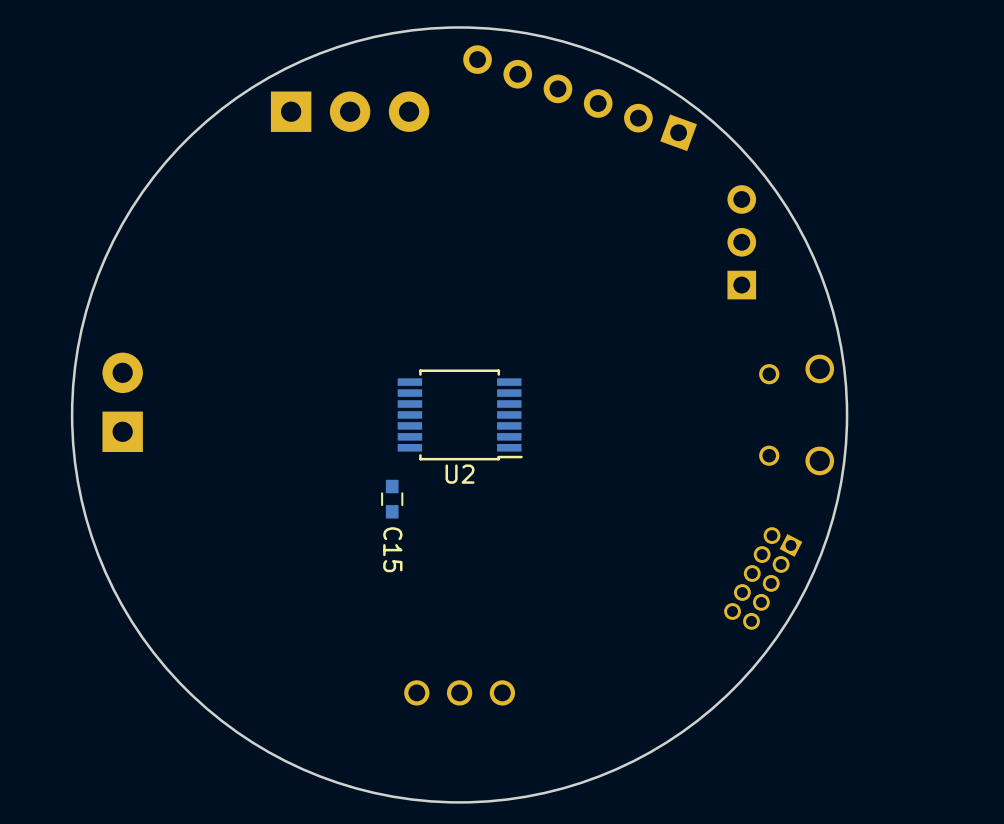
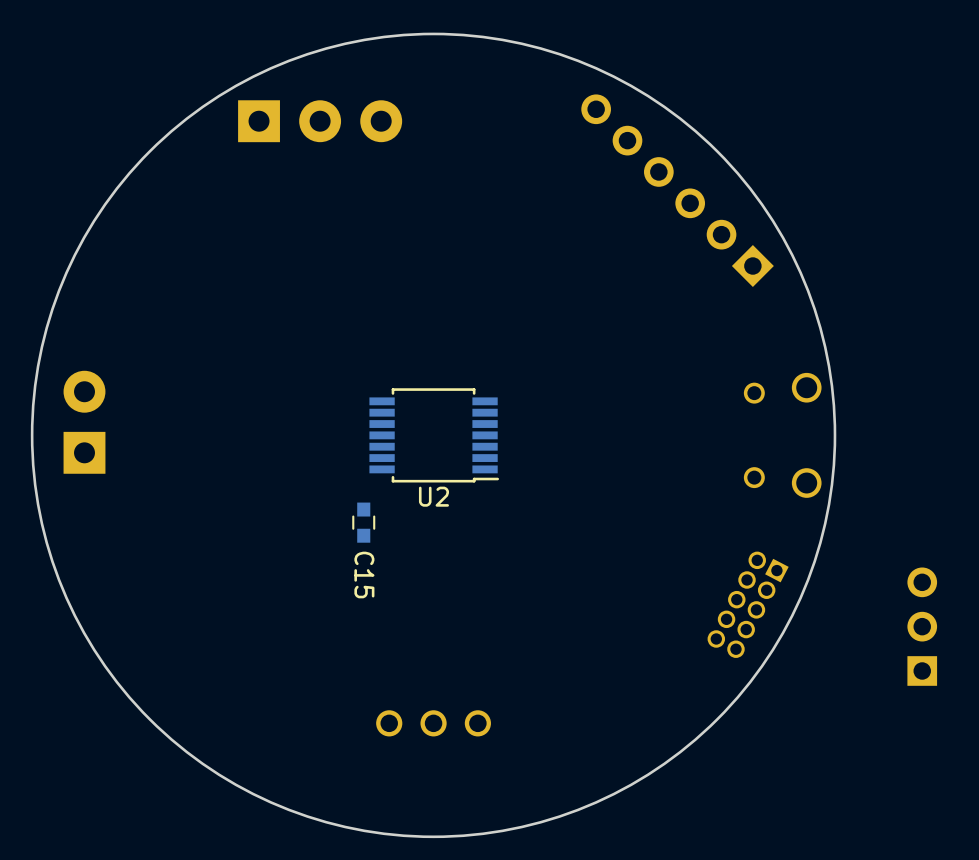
part: (580, 98) -> none
part: none -> (677, 190)
part position: (741, 242) -> (922, 626)

